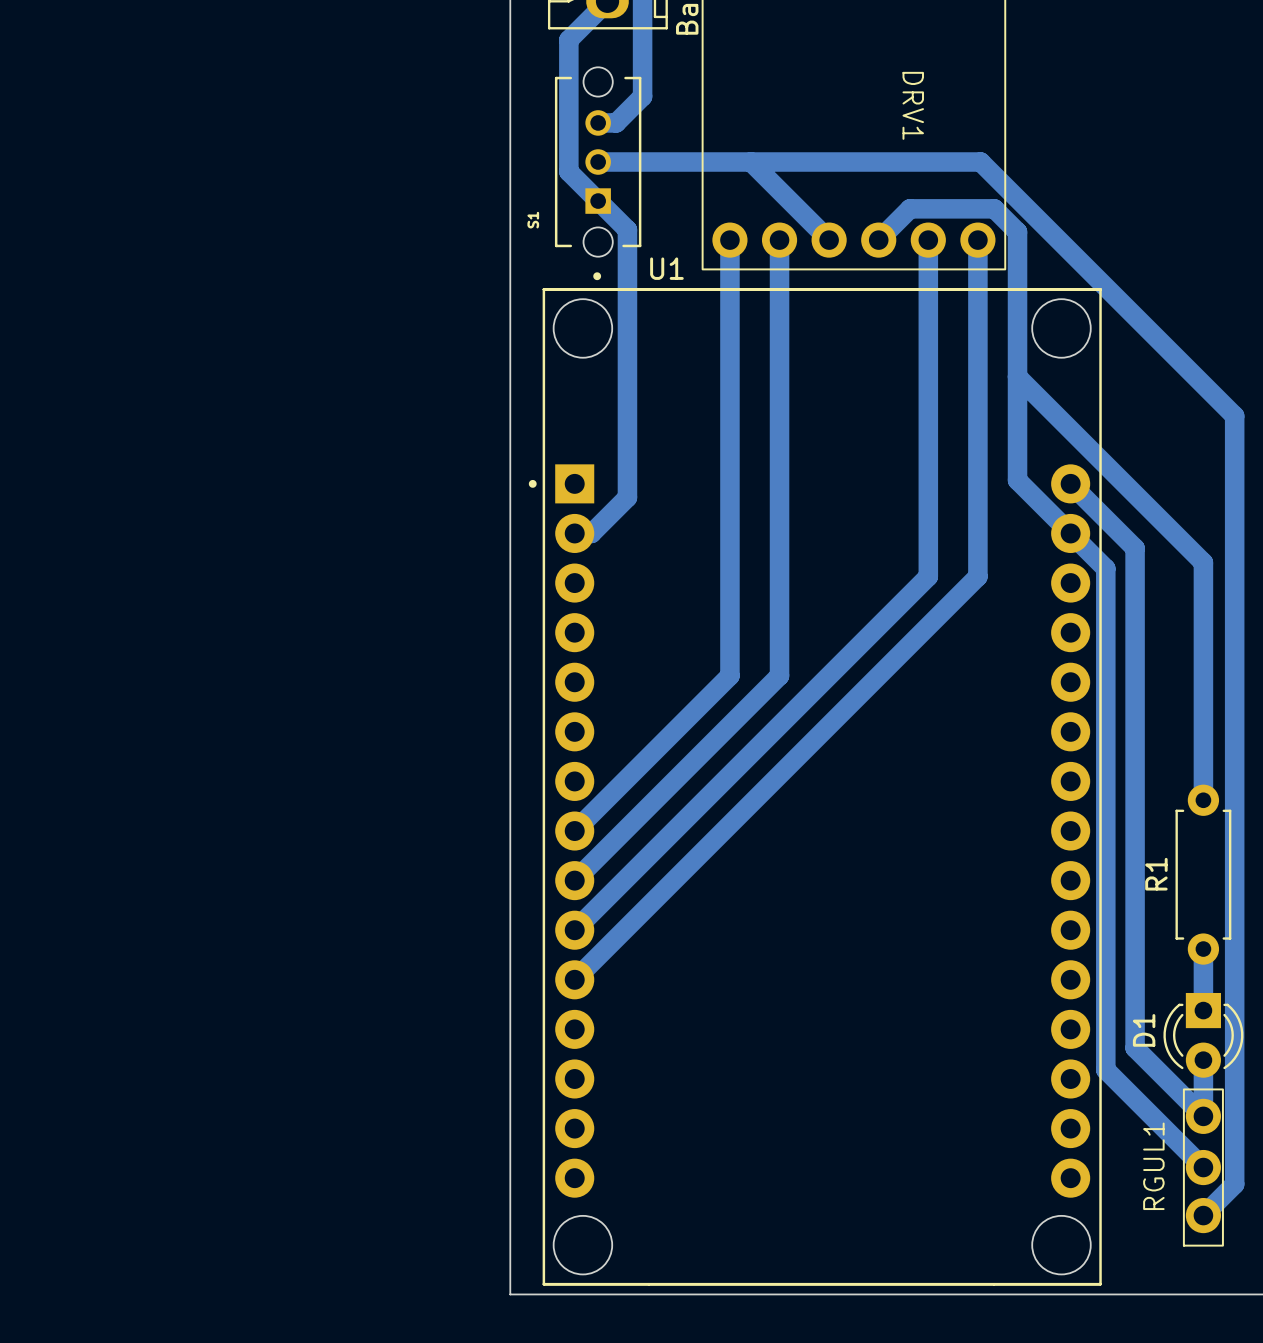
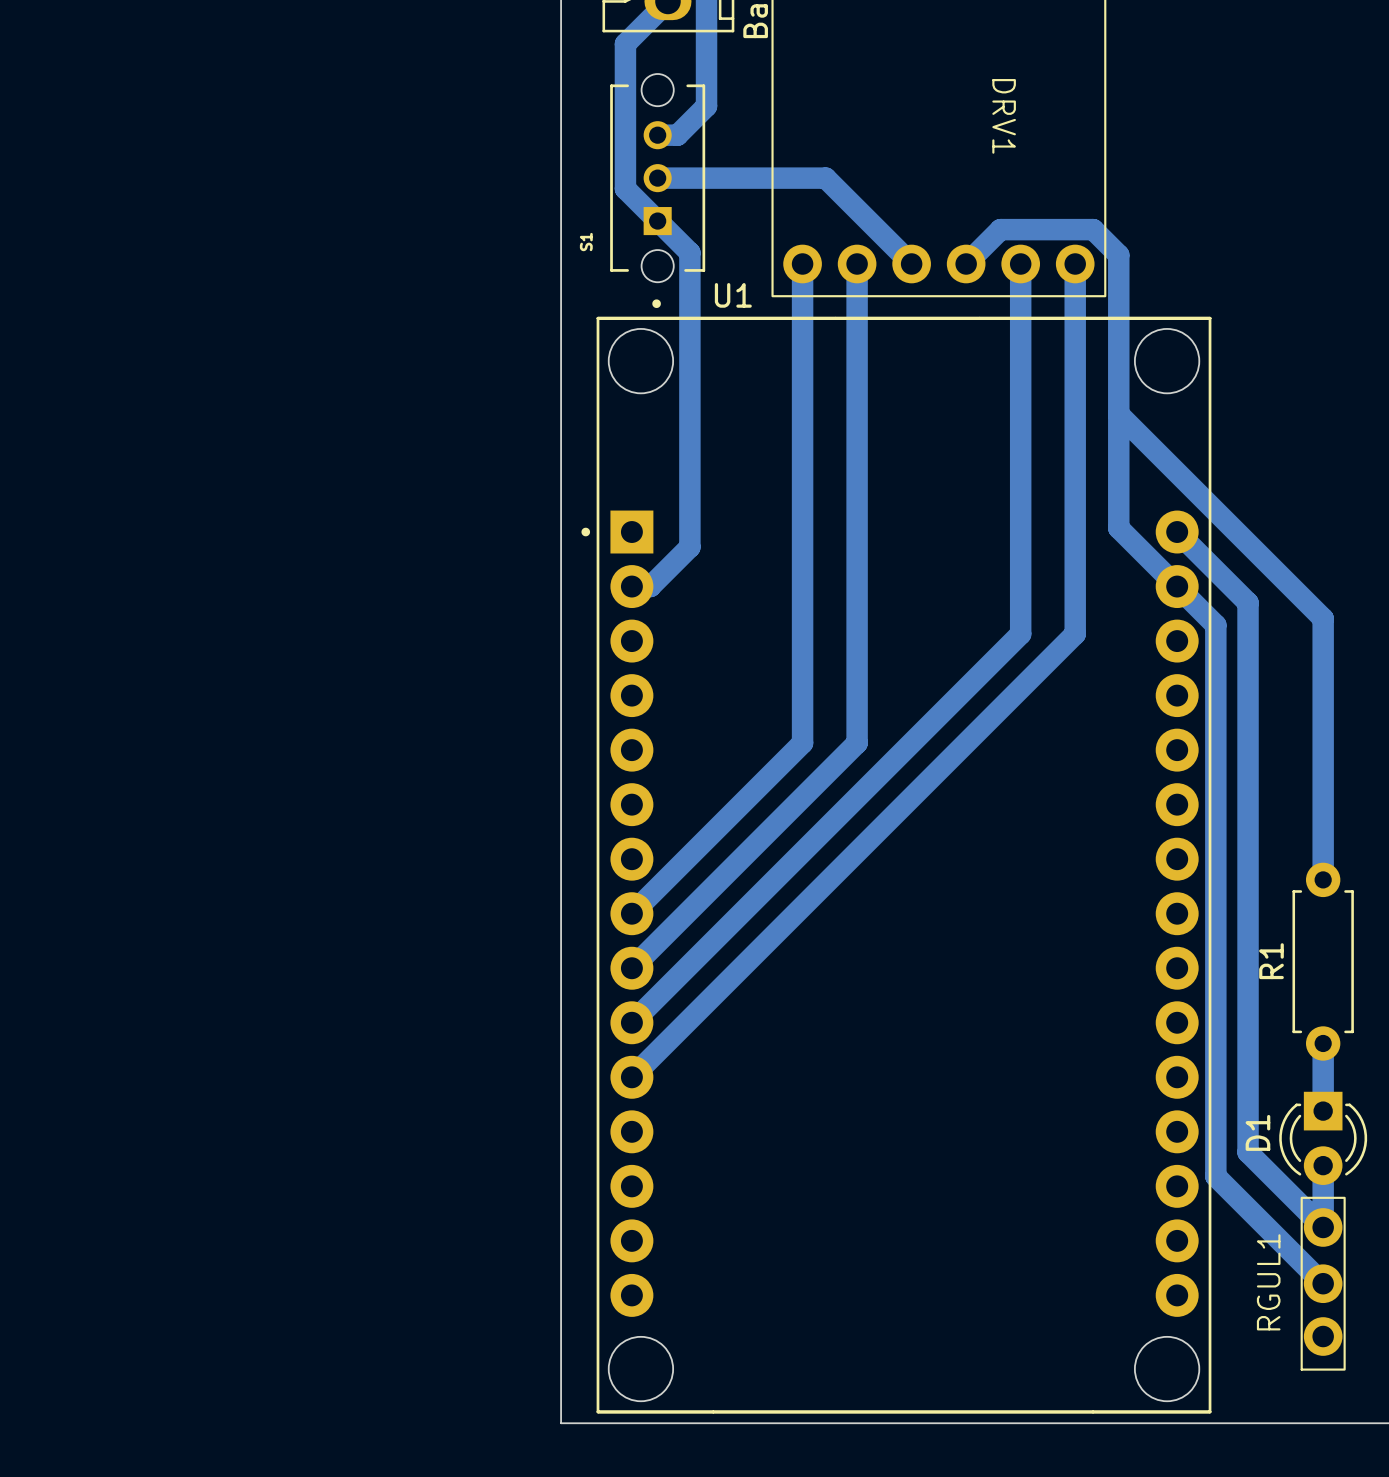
bottom track: (751, 162) (980, 162) (1234, 415) (1234, 1184) (1203, 1215) -> none

